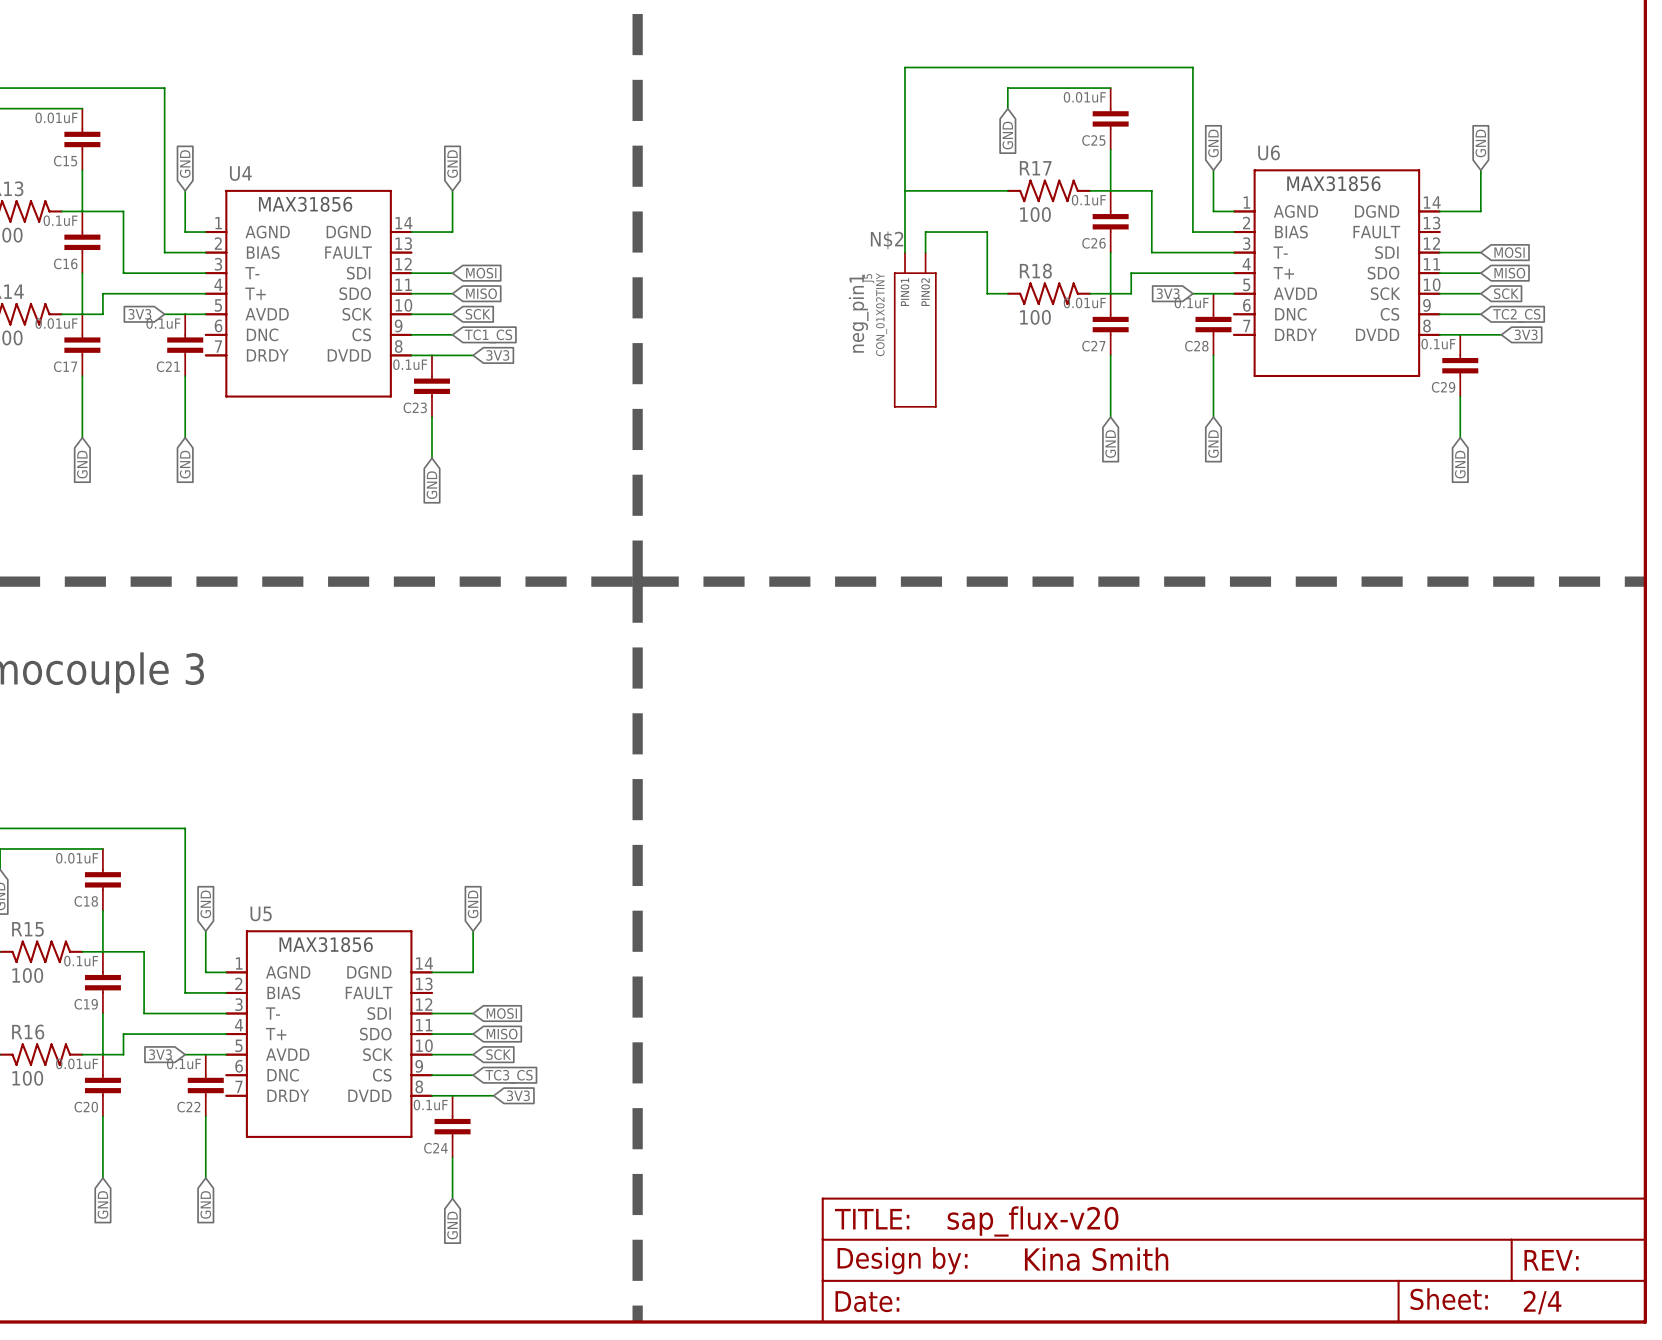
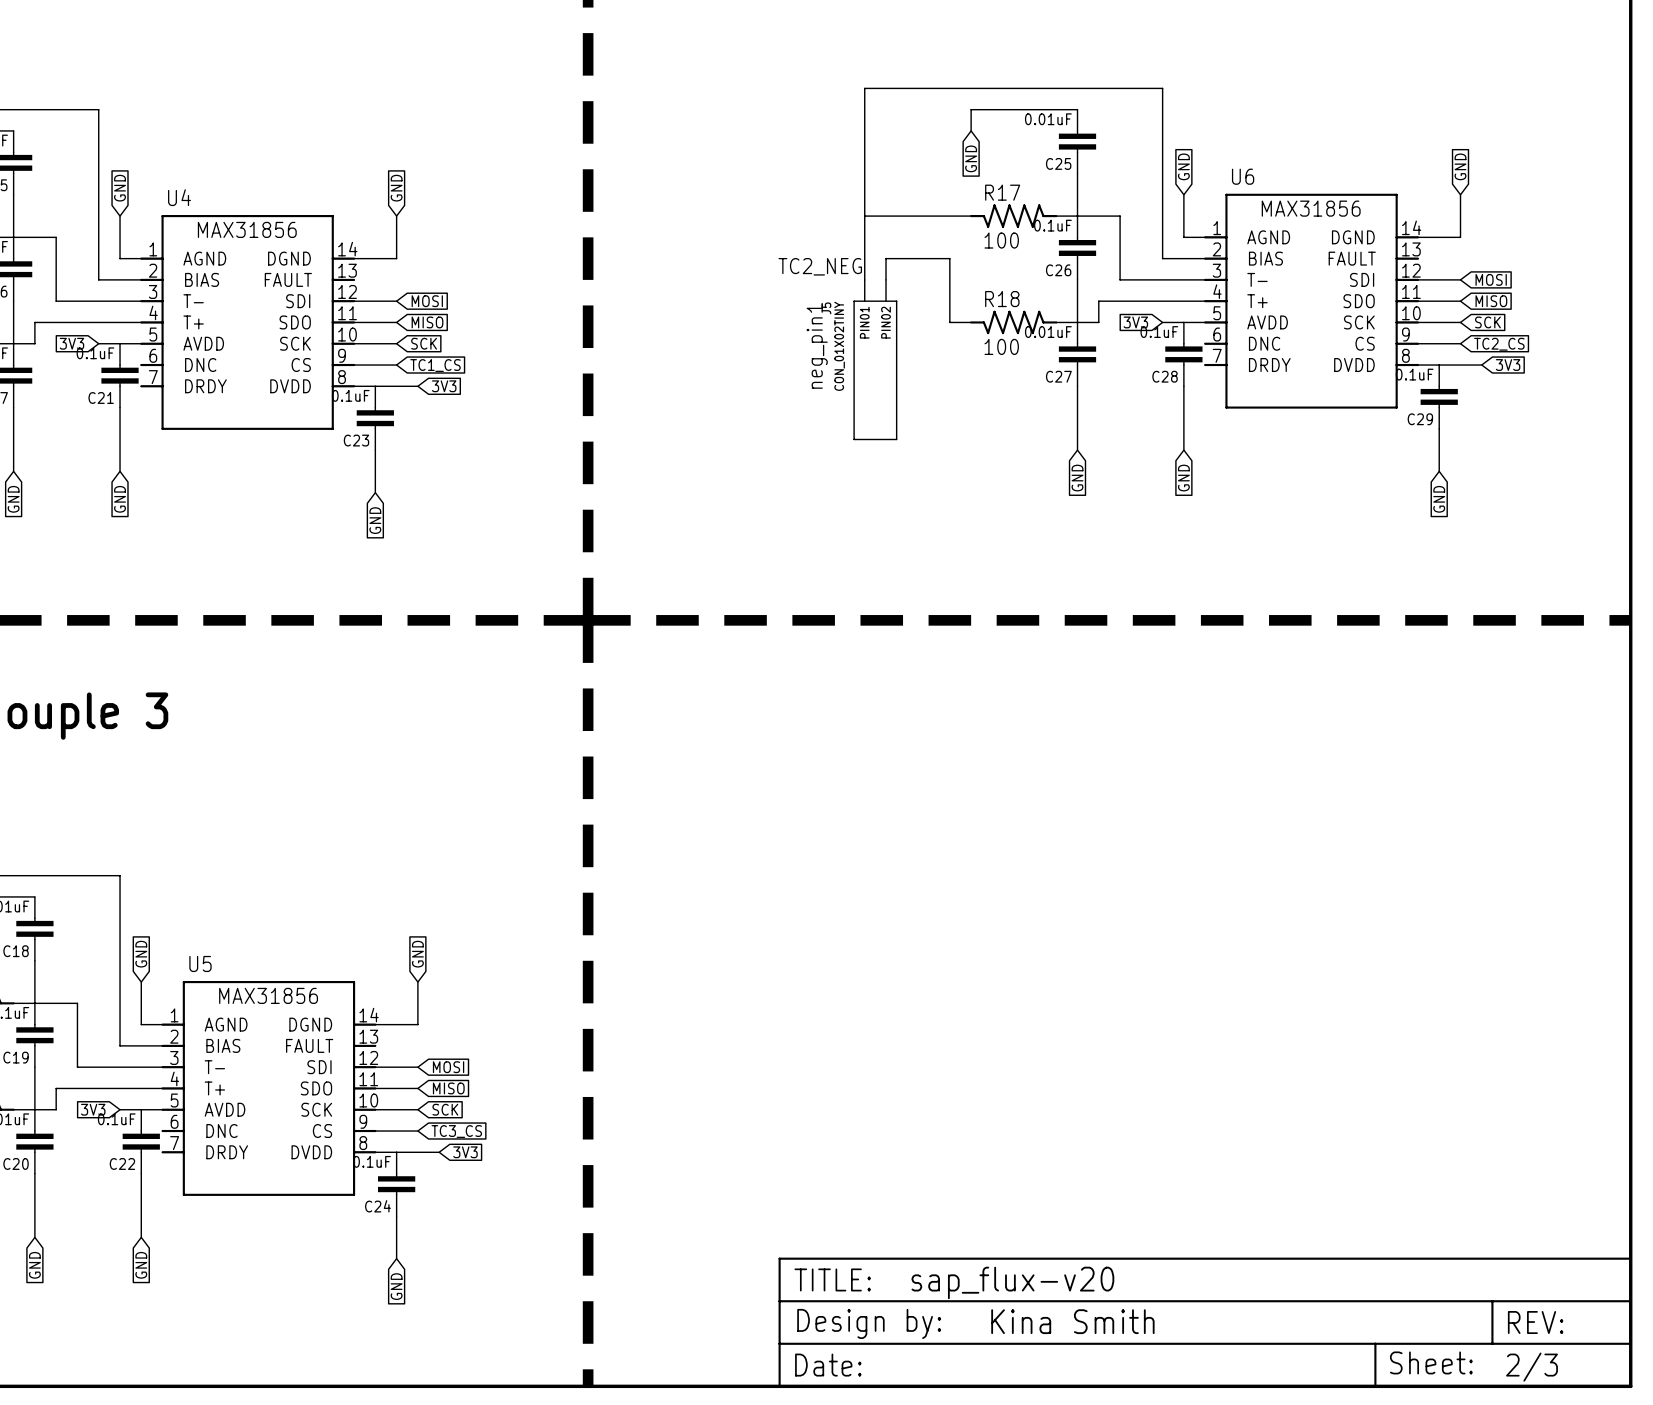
label: N$2 (887, 240) -> TC2_NEG (820, 266)
part text: 2/4 (1542, 1302) -> 2/3 (1531, 1367)

